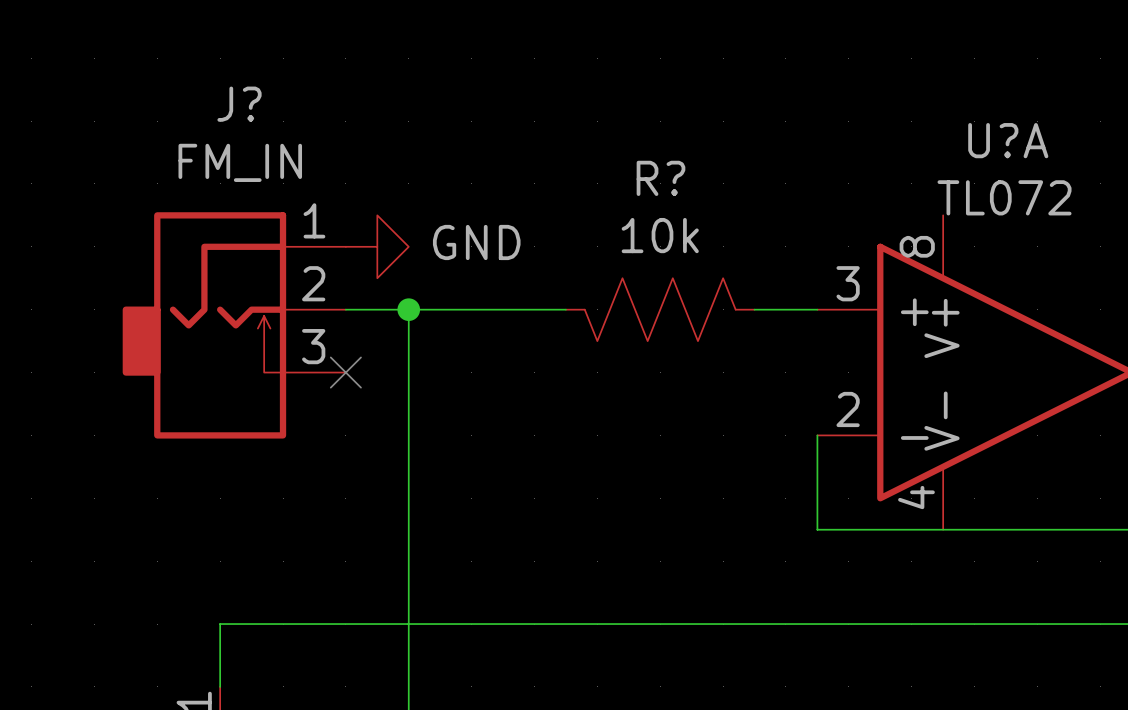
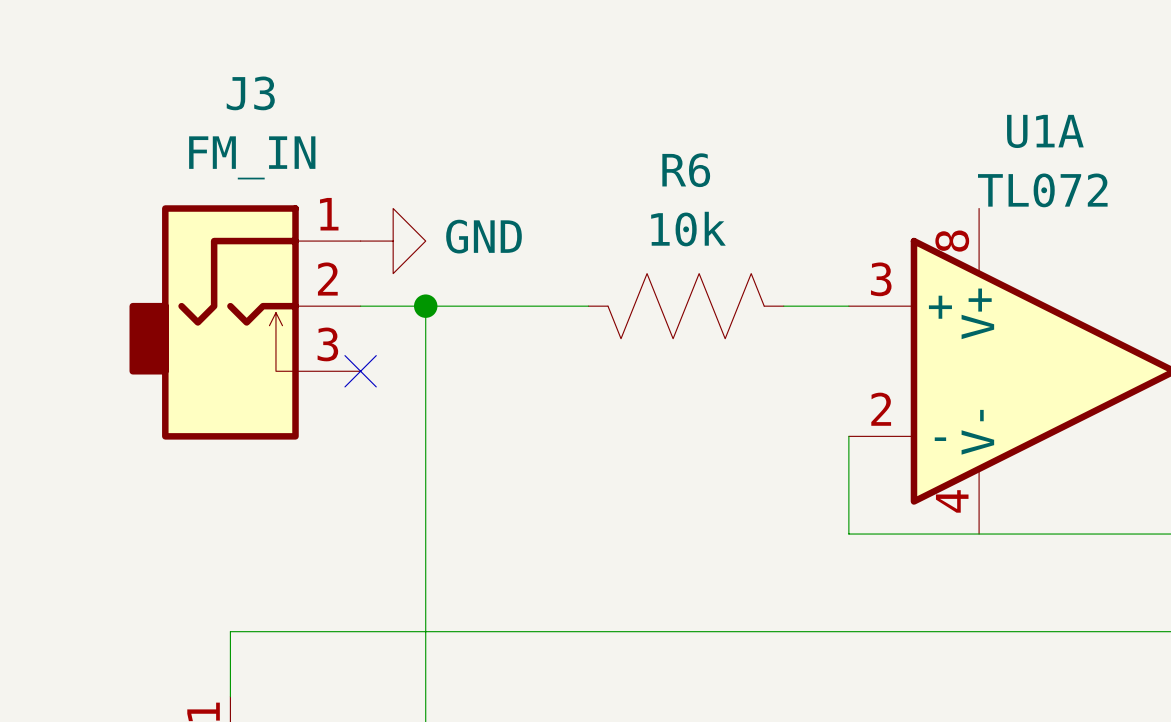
J? name: J? (239, 104) -> J3 (250, 93)
U?A name: U?A (1008, 140) -> U1A (1045, 131)
R? name: R? (660, 178) -> R6 (686, 170)

